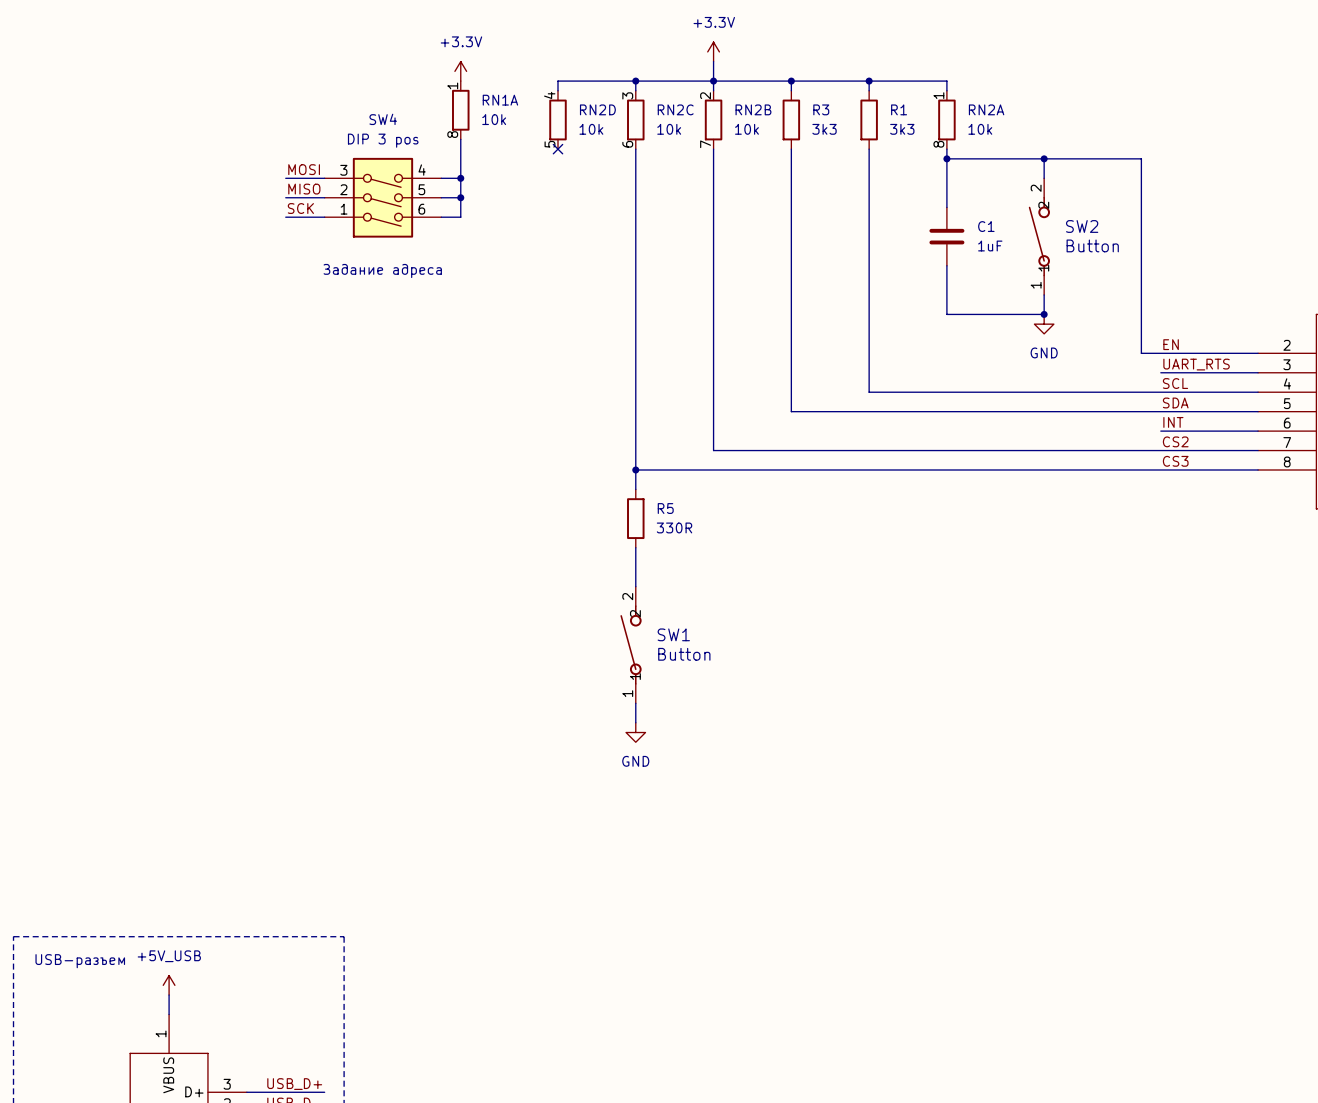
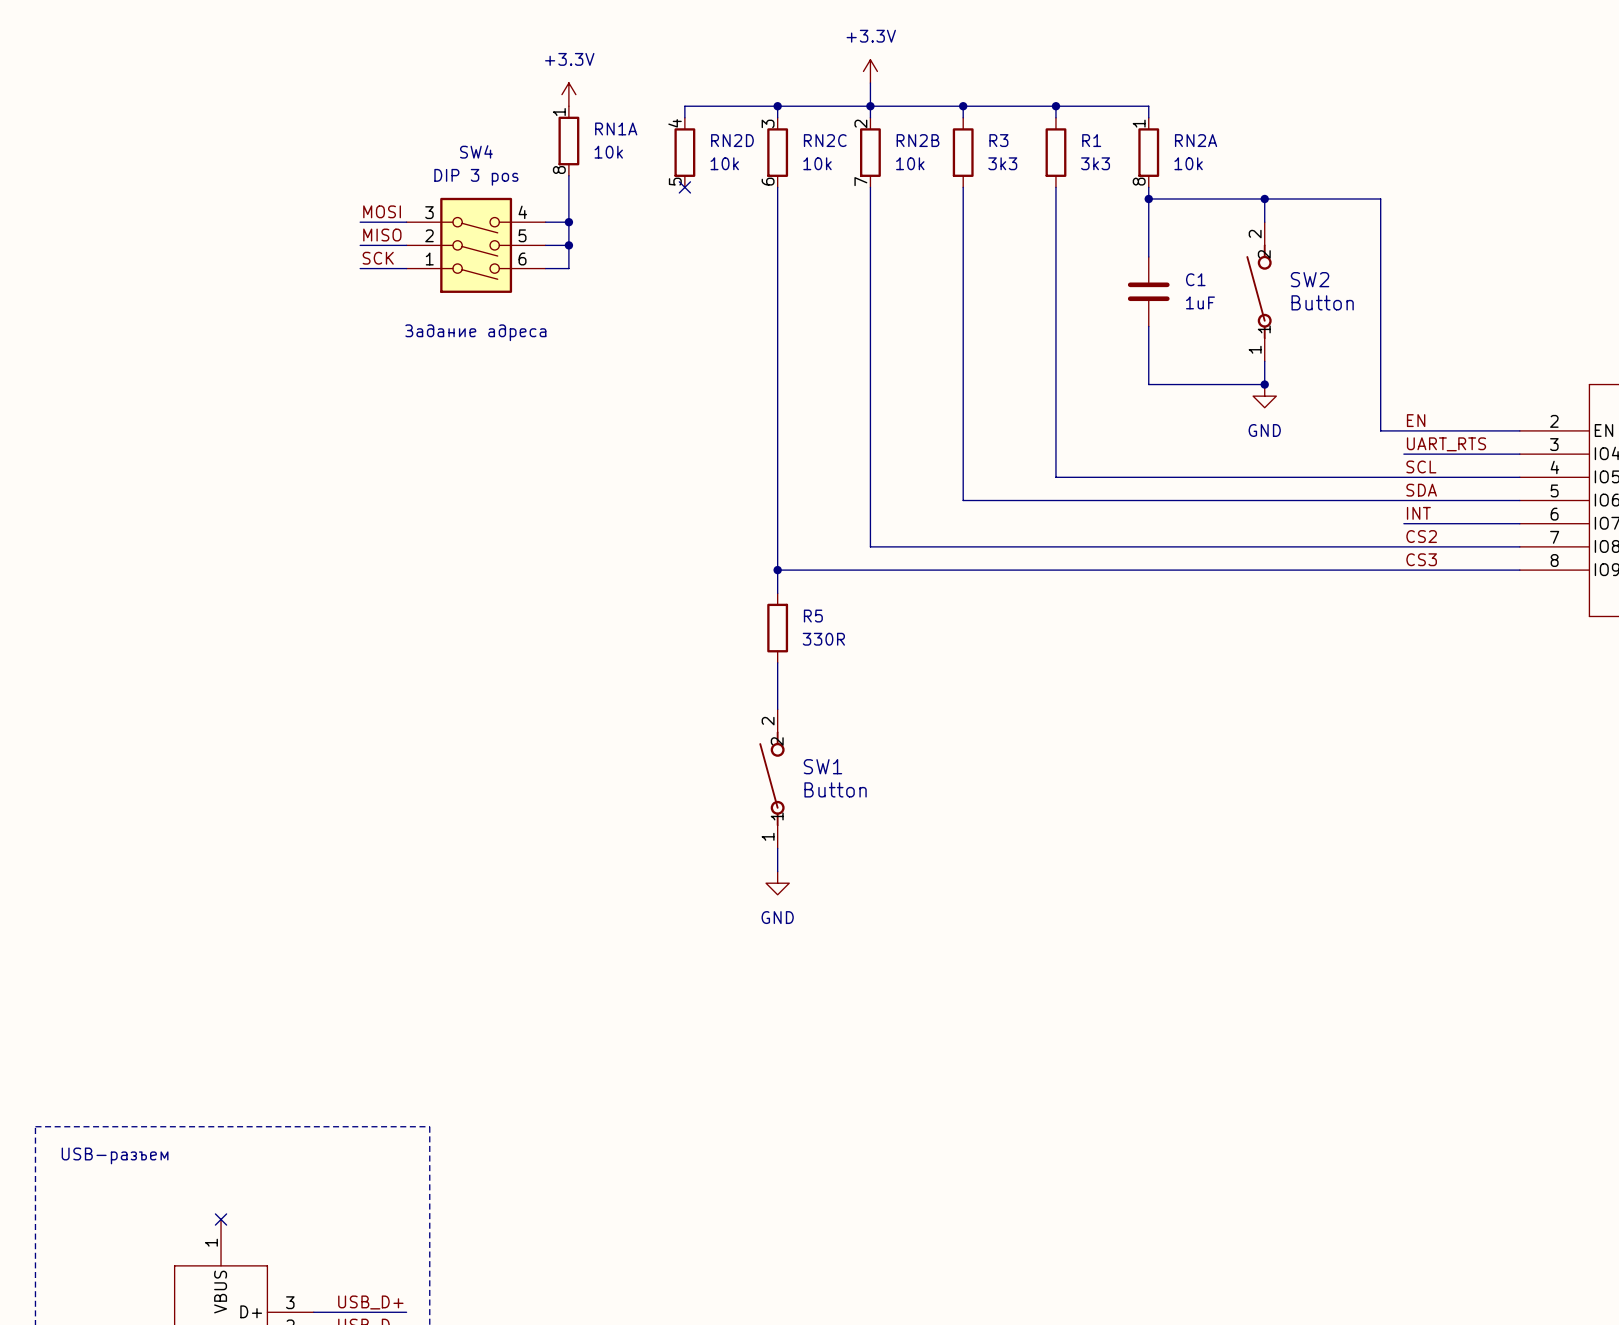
power symbol: +5V_USB (169, 985) -> none
wire: (169, 995) (169, 1014) -> none
no-connect mark: none -> (221, 1219)

